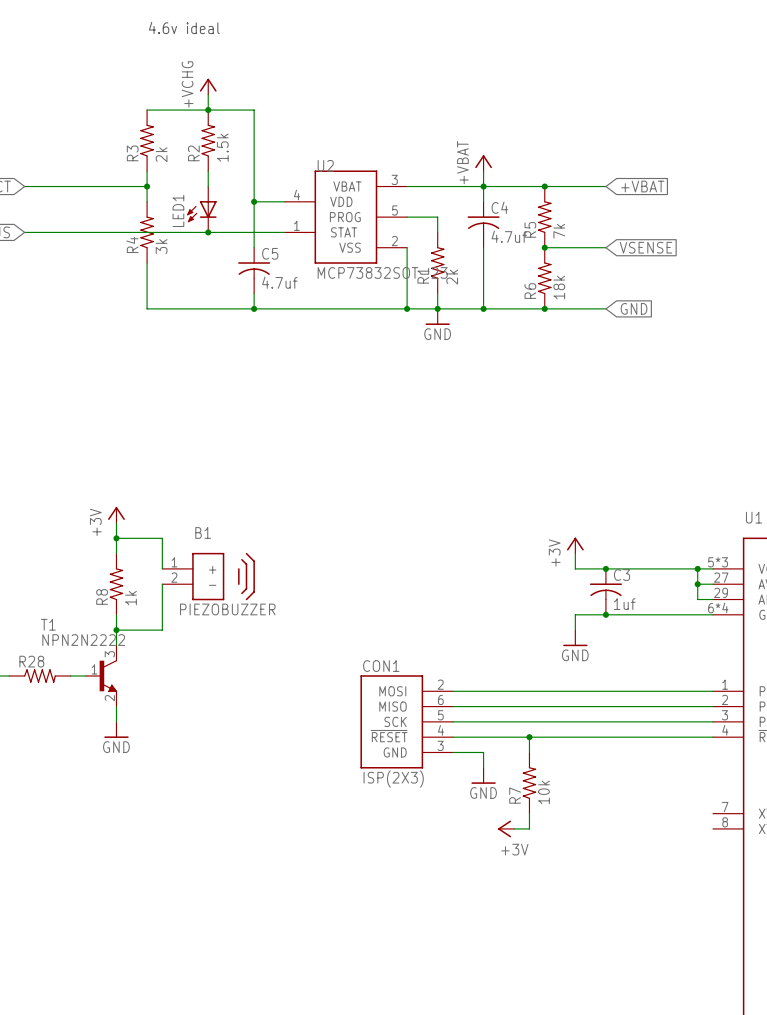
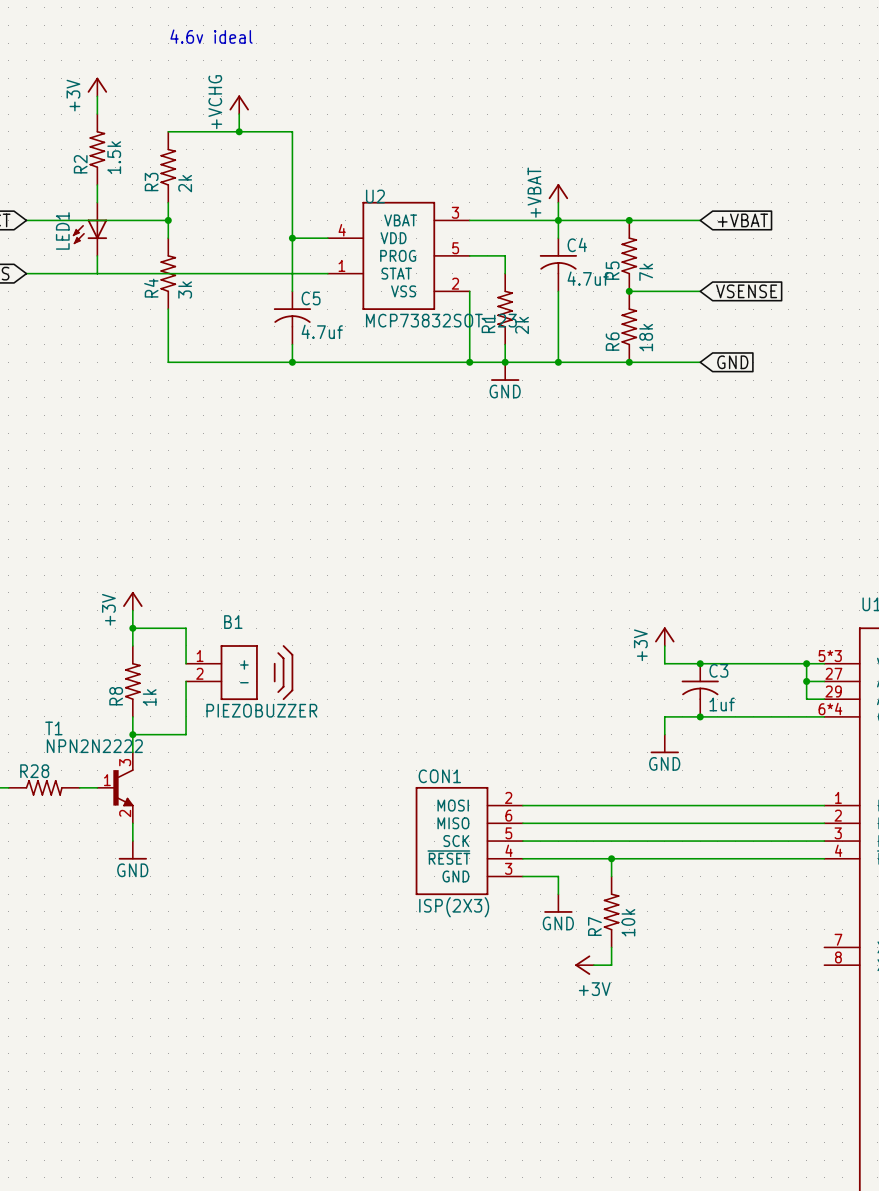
power symbol: none -> +3V (97, 87)
wire: none -> (97, 96) (97, 114)
R2 position: (208, 140) -> (97, 149)
wire: (208, 171) (208, 186) -> (97, 184) (97, 202)
LED1 position: (201, 209) -> (90, 229)
wire: none -> (97, 255) (97, 273)
junction: (208, 232) -> none

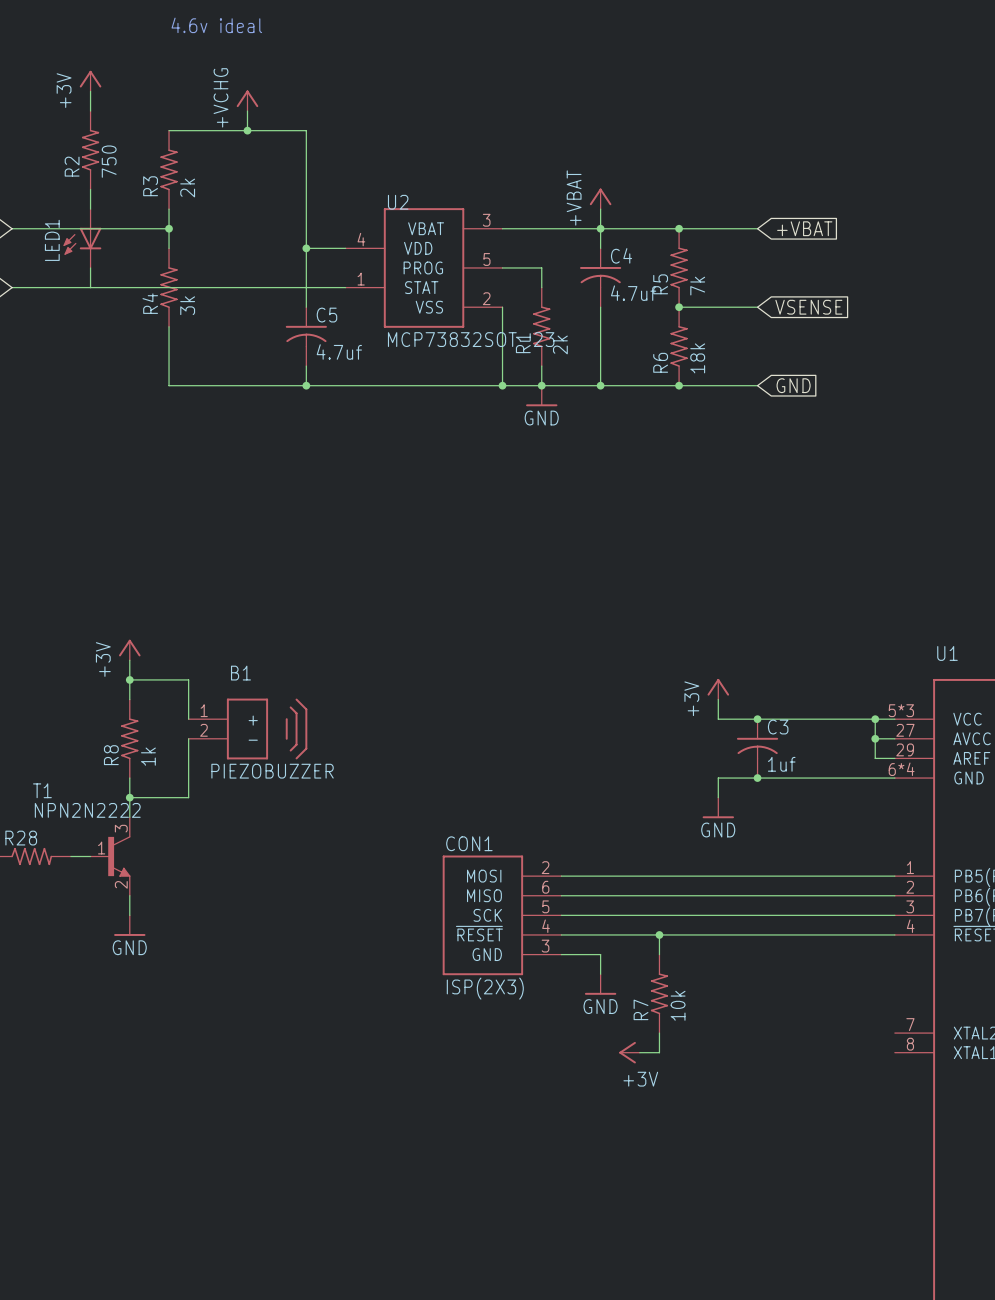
R2 value: 1.5k (114, 157) -> 750 (109, 161)

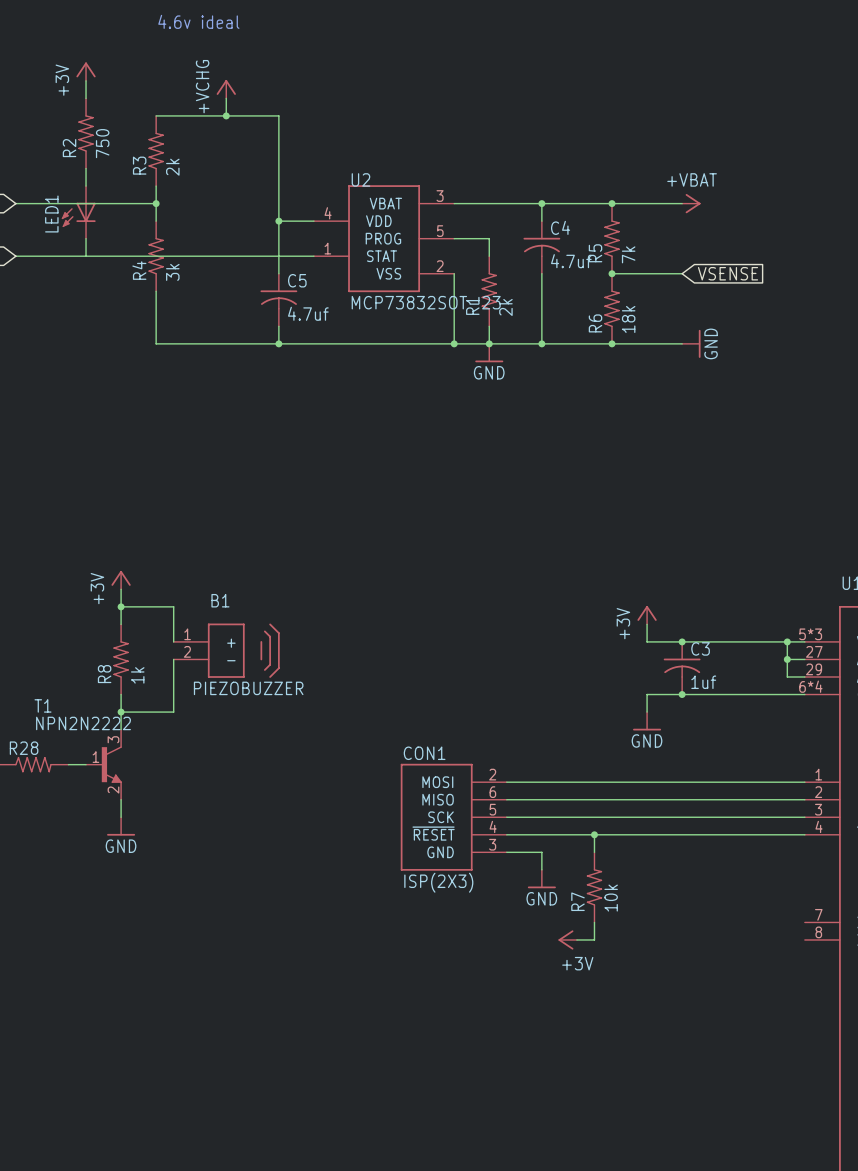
power symbol rotation: 0° (600, 196) -> 90° clockwise (693, 203)
power symbol position: +VBAT (600, 198) -> +VBAT (691, 203)
wire: (600, 209) (600, 228) -> none
global label: +VBAT (804, 228) -> none
power symbol: none -> GND (691, 343)
global label: GND (793, 385) -> none

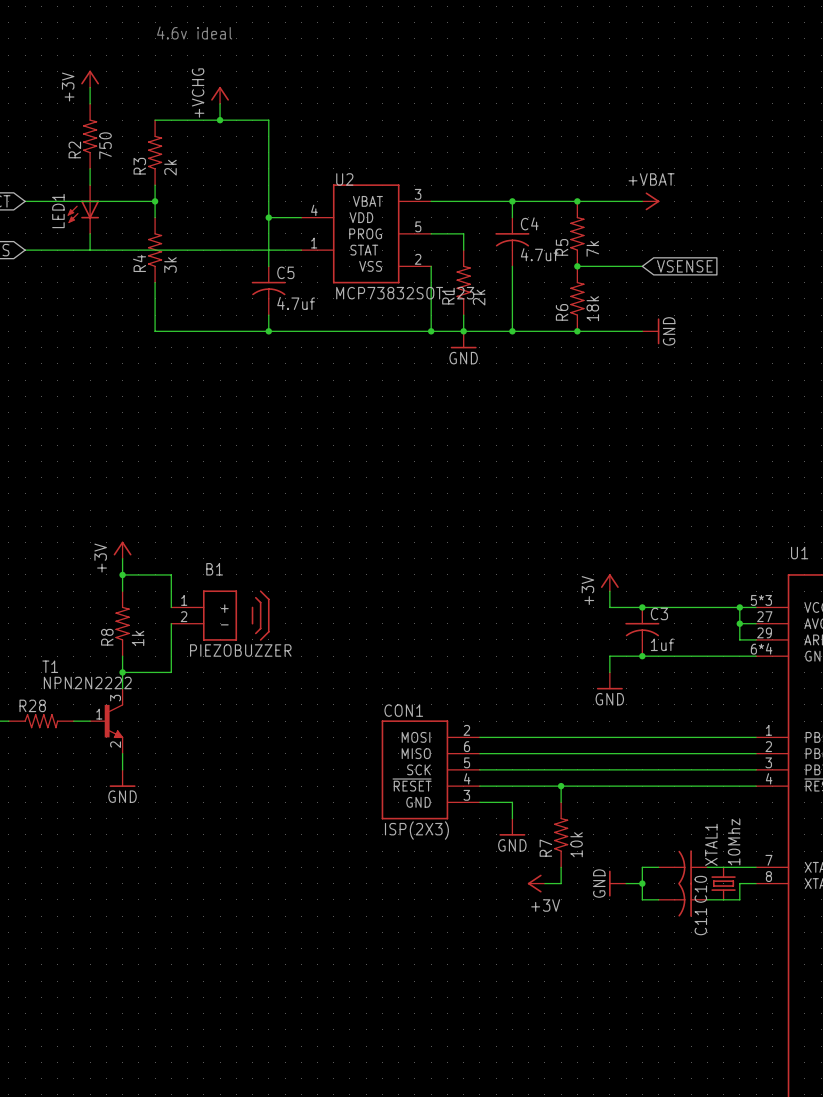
wire: none -> (658, 867) (642, 867) (642, 899) (658, 899)
C10: none -> (682, 867)
wire: none -> (707, 867) (756, 867)
power symbol: none -> GND (617, 883)
wire: none -> (626, 883) (642, 883)
junction: none -> (642, 883)
XTAL1: none -> 10Mhz (723, 883)
wire: none -> (756, 883) (739, 883) (739, 899) (707, 899)
C11: none -> (682, 899)

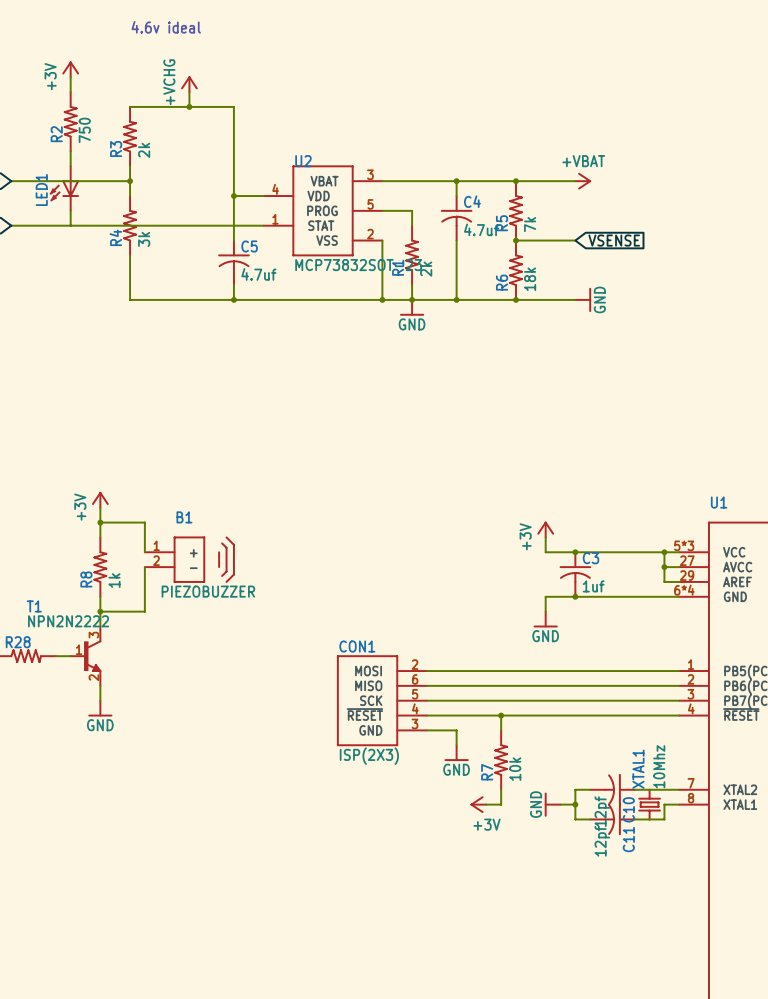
C10 value: none -> 12pf (602, 811)
C11 value: none -> 12pf (602, 841)

